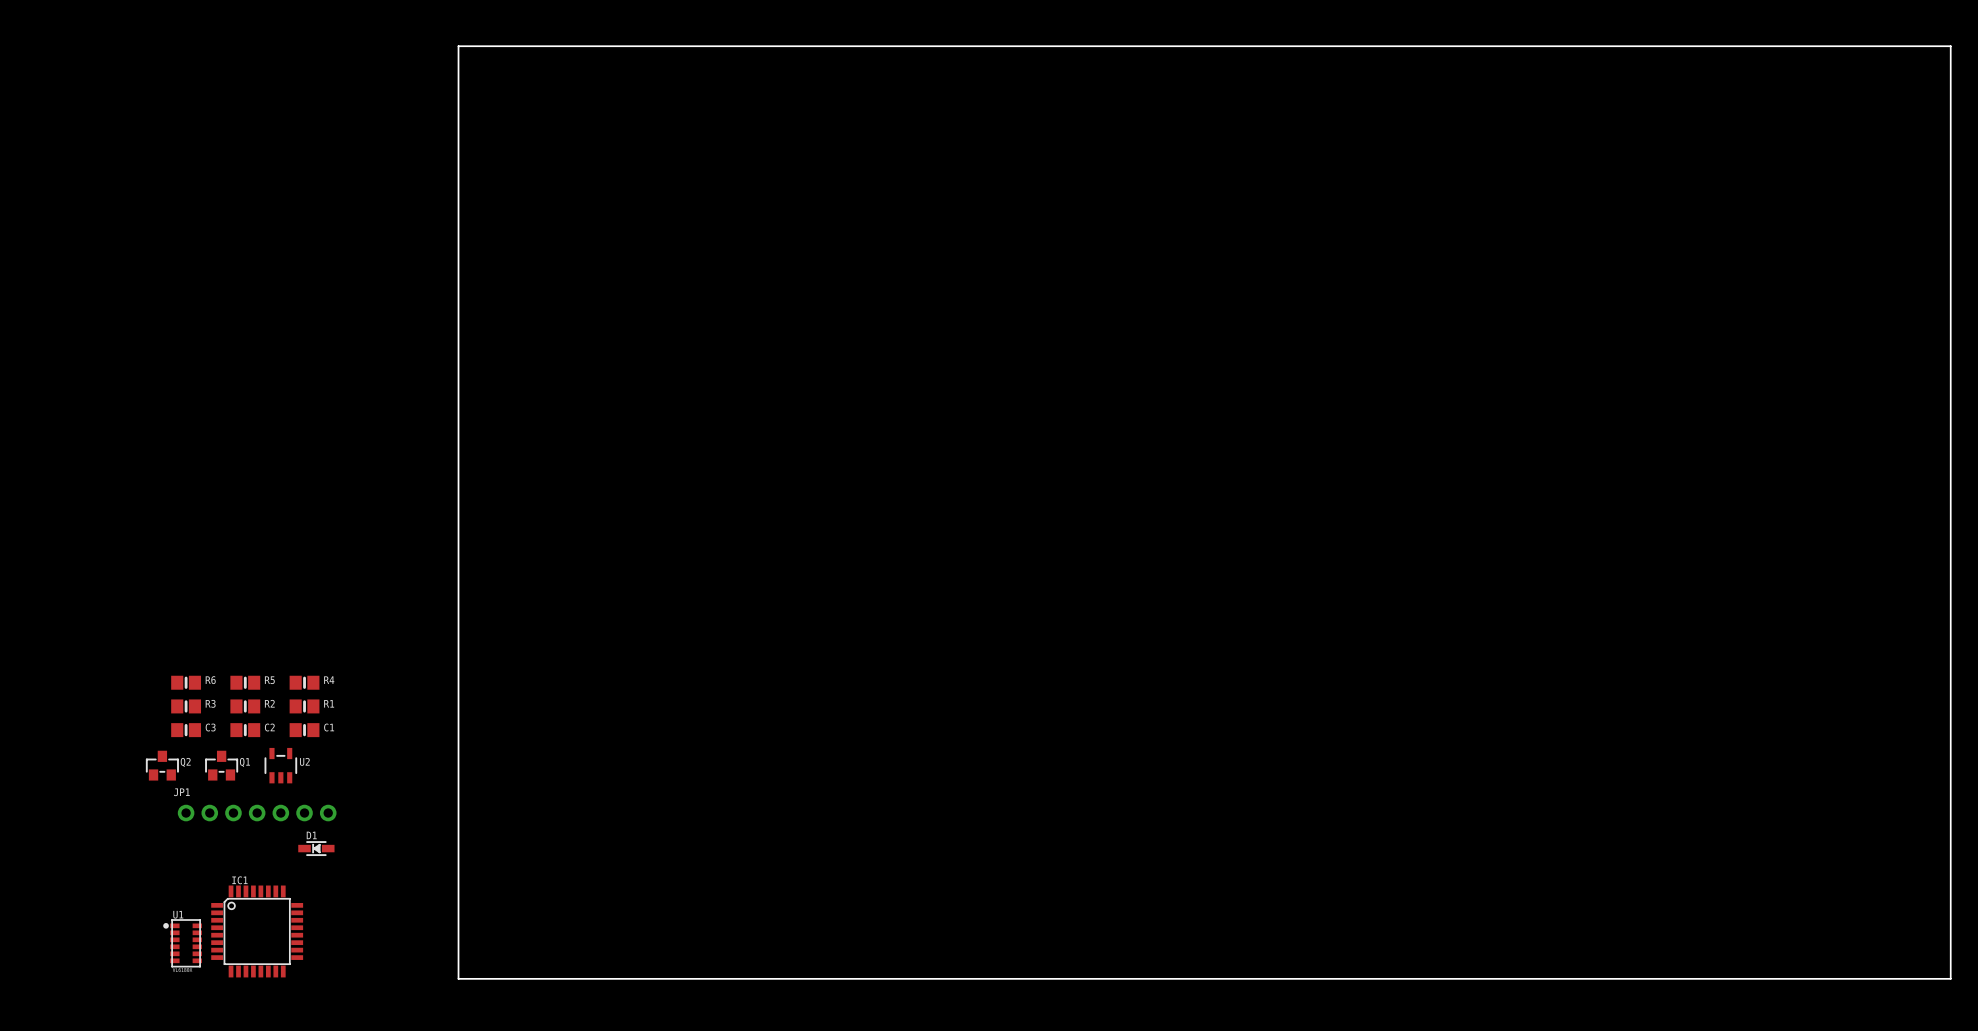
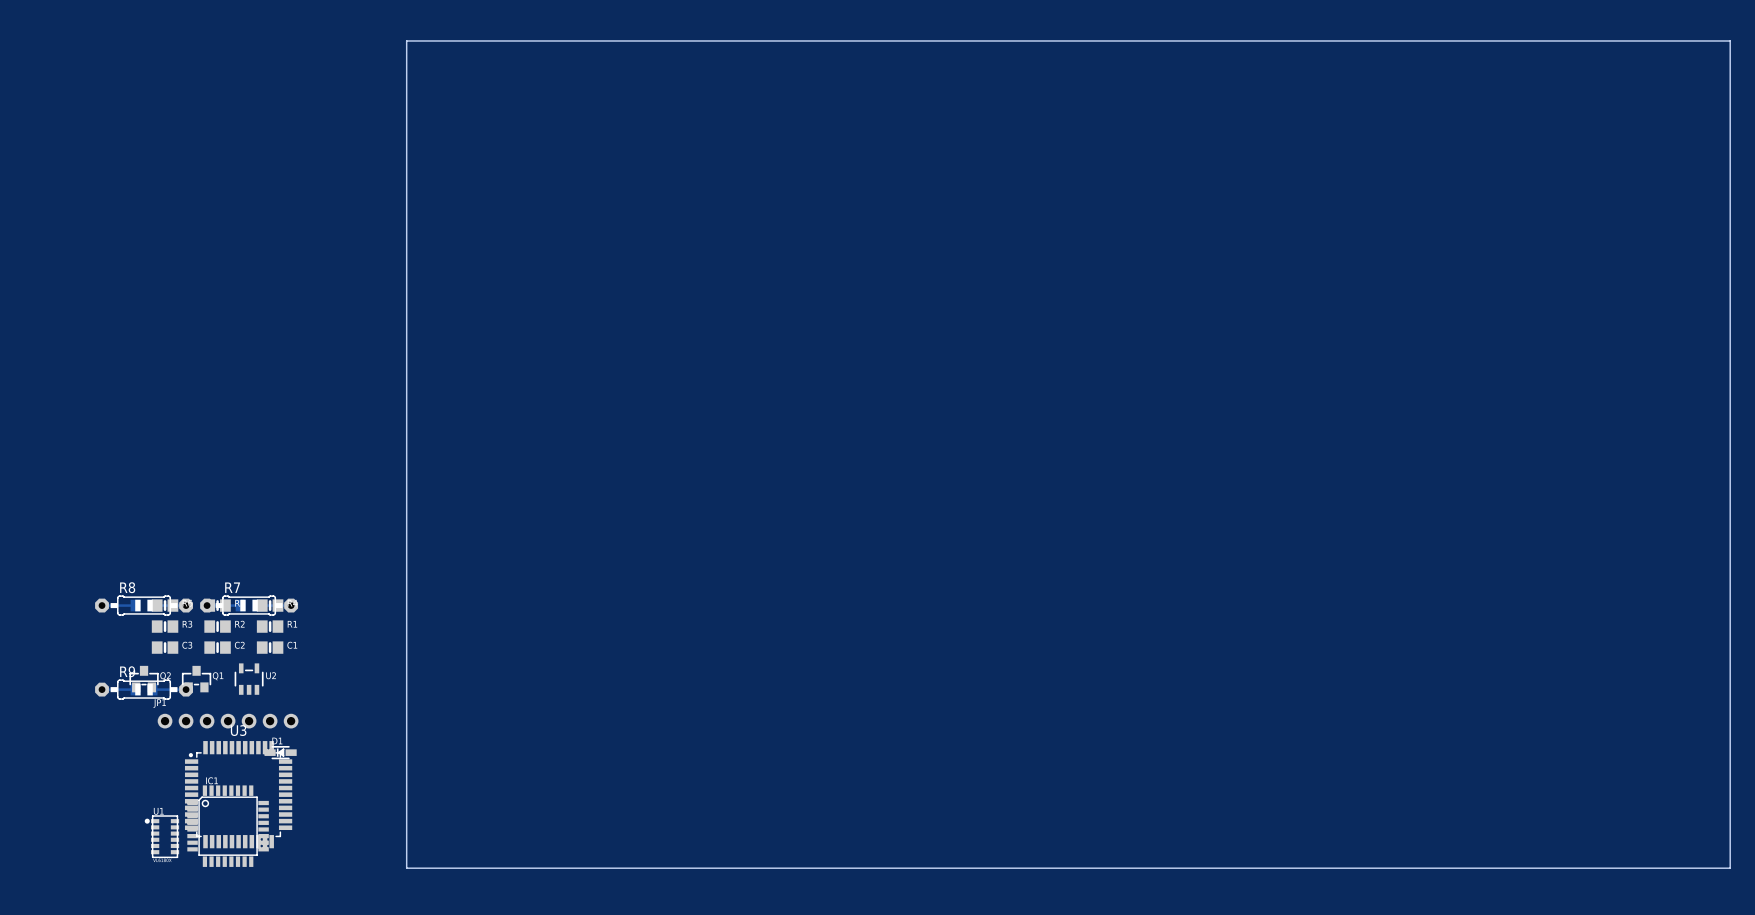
R8: none -> (144, 605)
R7: none -> (249, 605)
R9: none -> (144, 689)
U3: none -> (238, 794)

